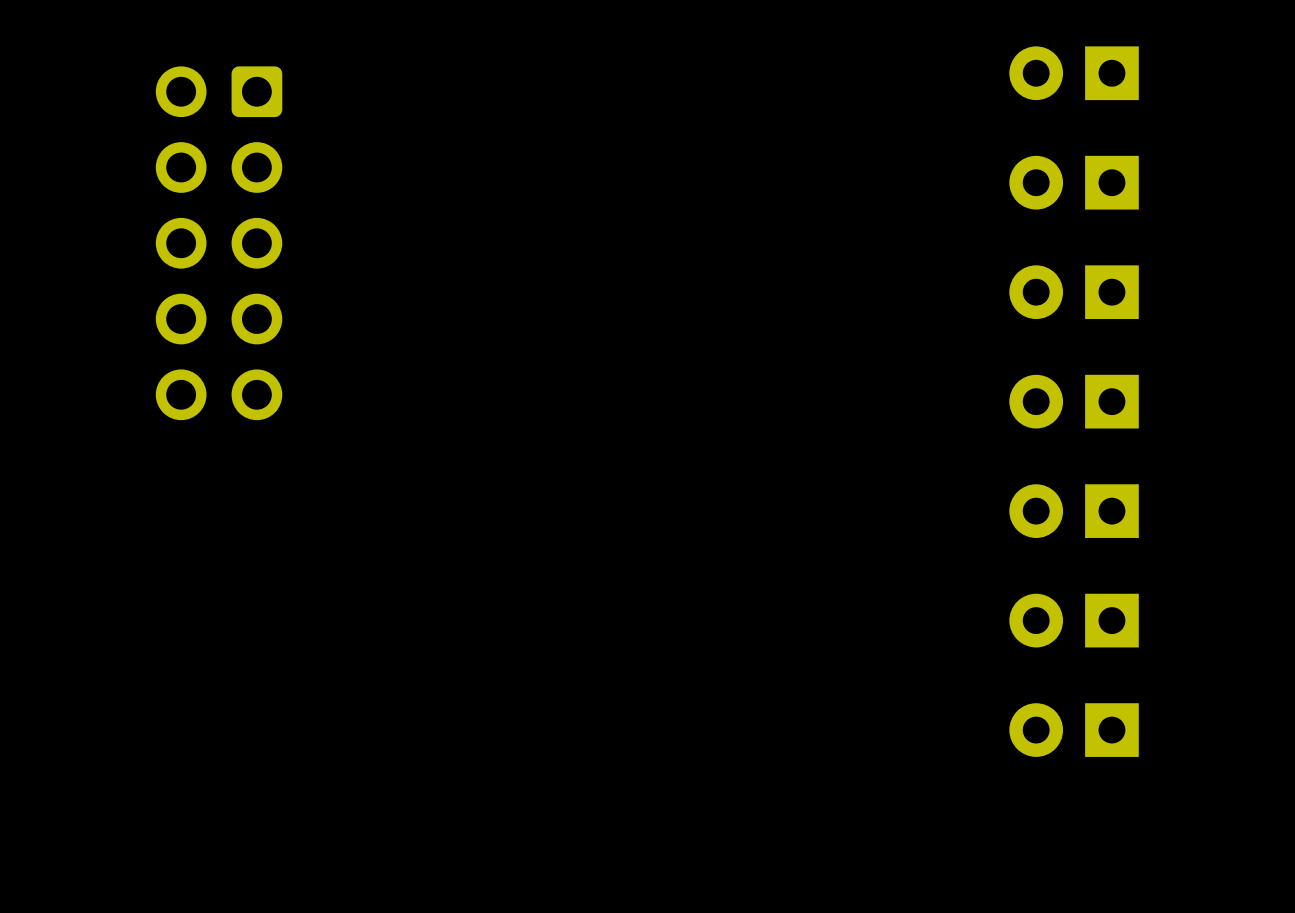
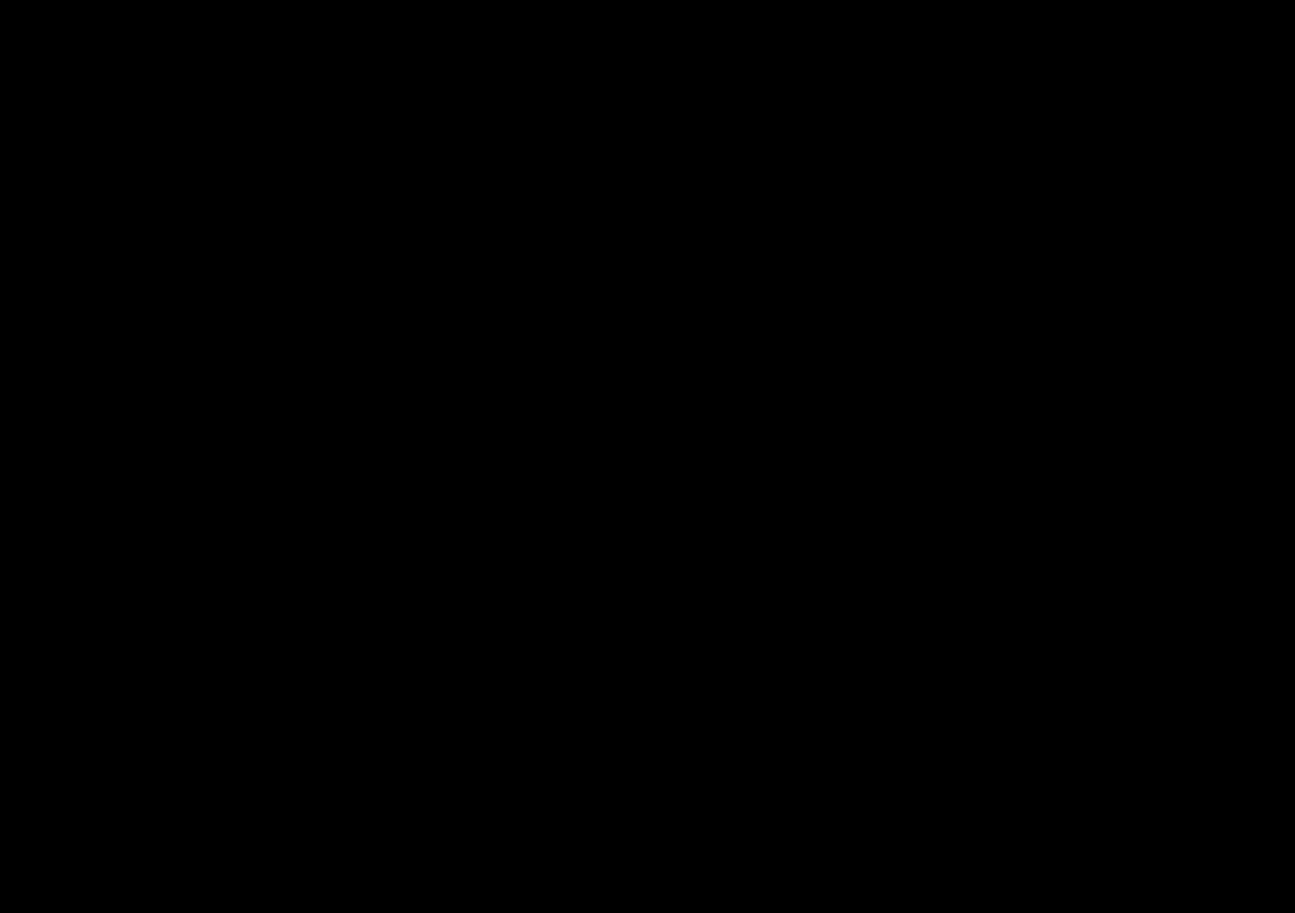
part: (1074, 73) -> none
part: (1074, 182) -> none
part: (219, 243) -> none
part: (1074, 292) -> none
part: (1074, 401) -> none
part: (1074, 511) -> none
part: (1074, 620) -> none
part: (1074, 730) -> none

